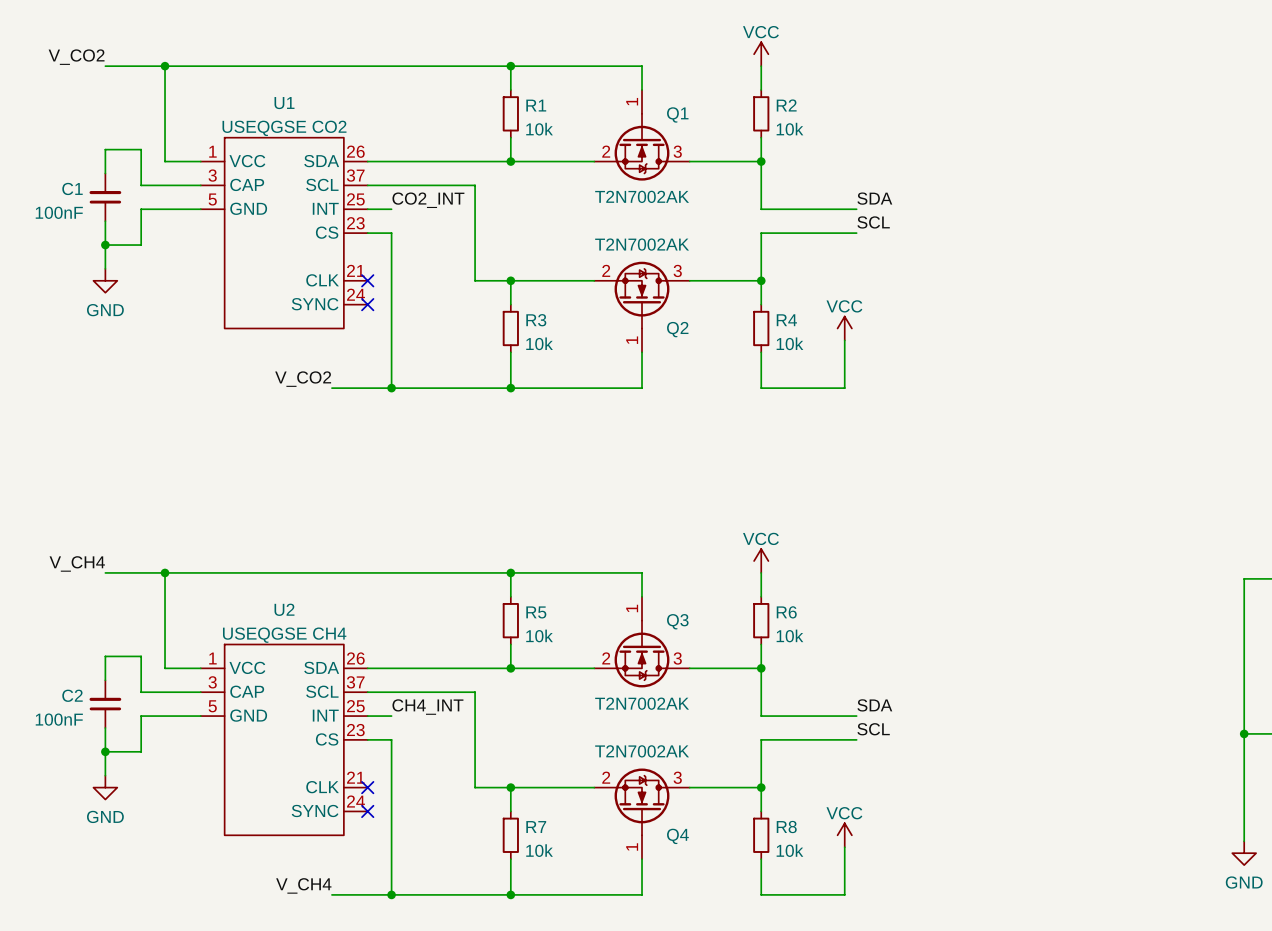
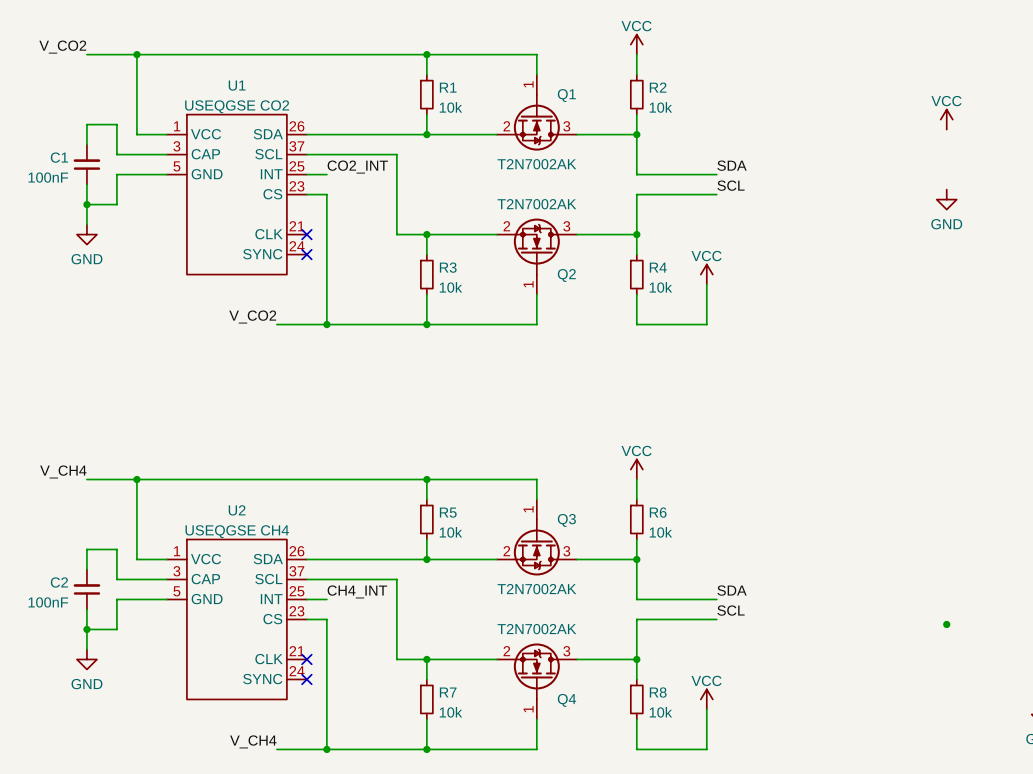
power symbol: none -> VCC (946, 119)
power symbol: none -> GND (946, 199)
junction: none -> (946, 624)

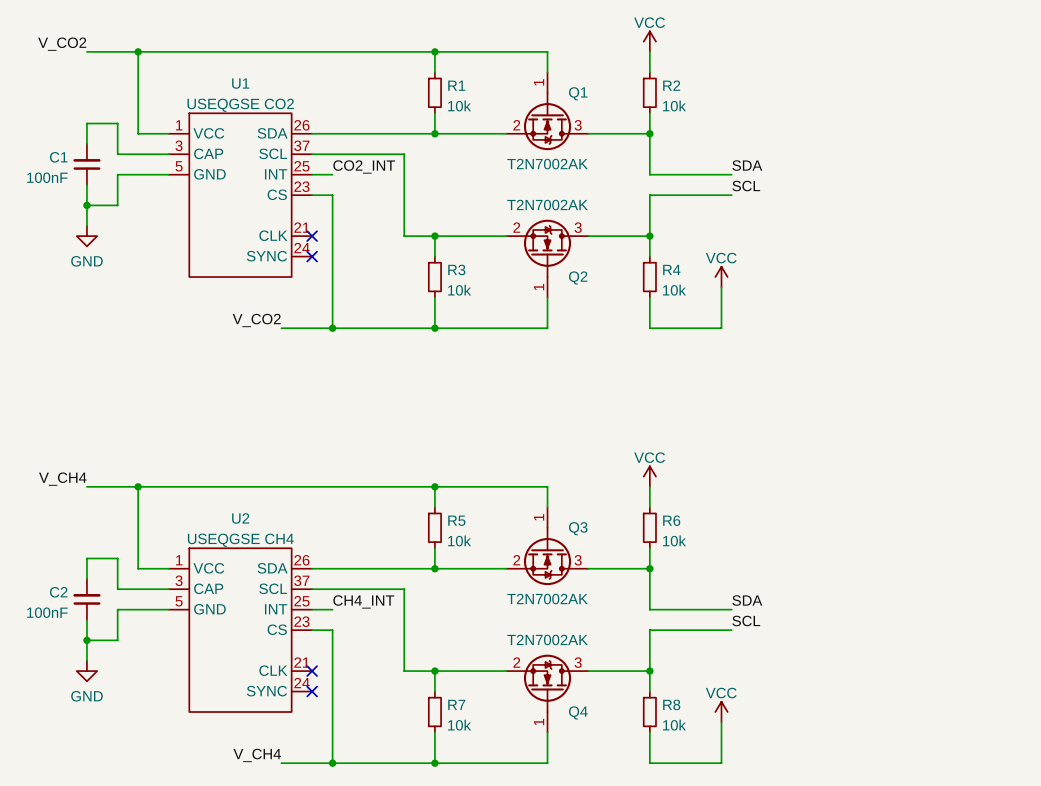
power symbol: VCC (946, 119) -> none
power symbol: GND (946, 199) -> none
junction: (946, 624) -> none

